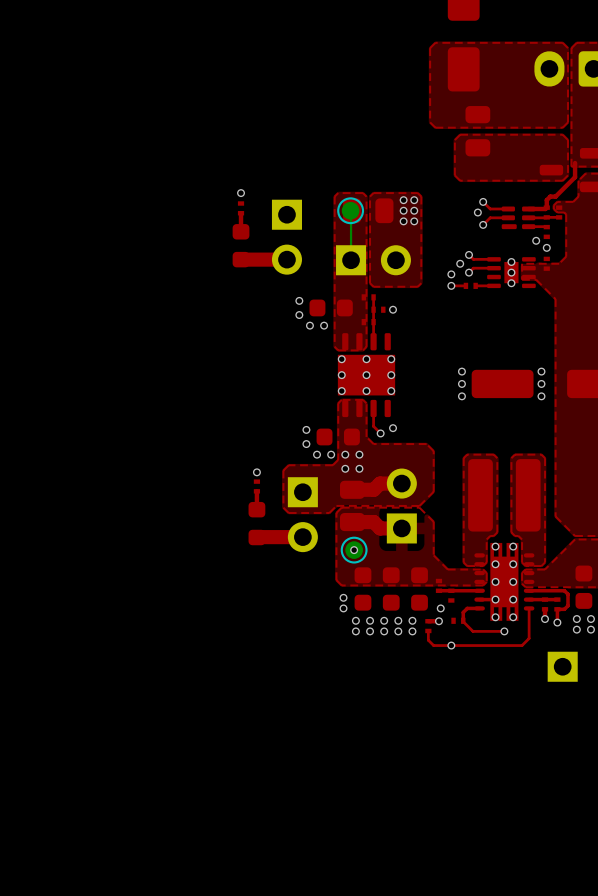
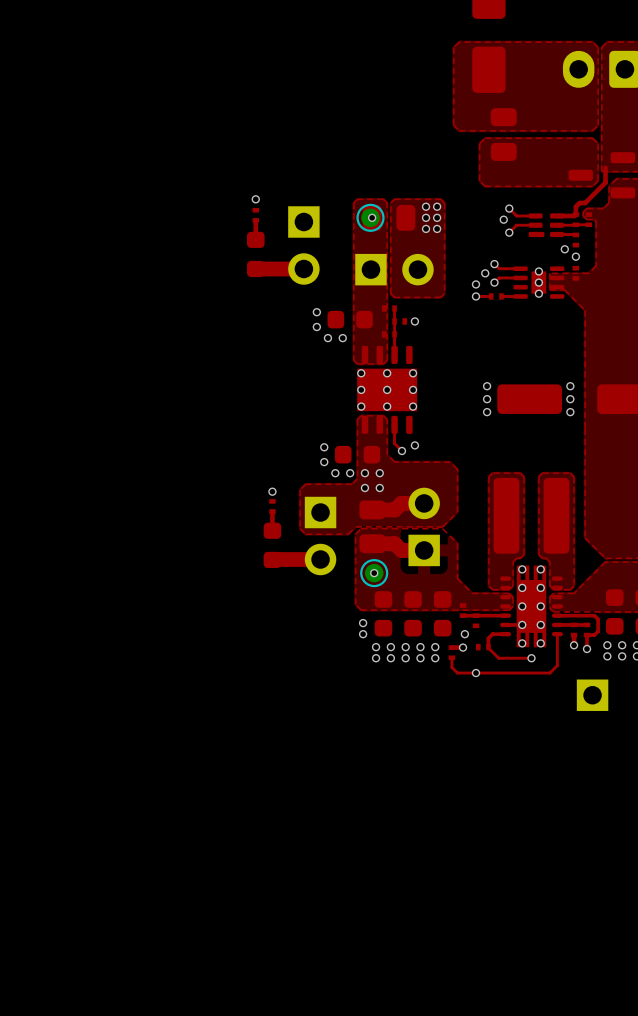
bottom track: (350, 210) (351, 260) -> none
via: none -> (372, 217)

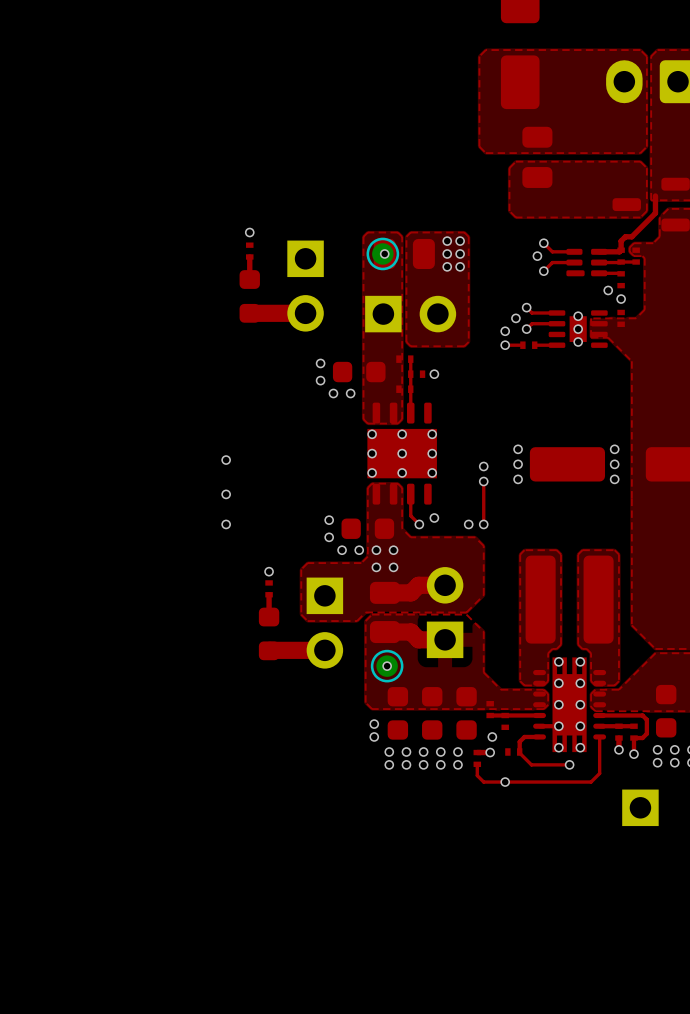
via: none -> (226, 460)
via: none -> (483, 466)
top track: none -> (483, 481) (483, 524)
via: none -> (483, 481)
via: none -> (226, 494)
via: none -> (226, 524)
via: none -> (468, 524)
via: none -> (483, 524)

